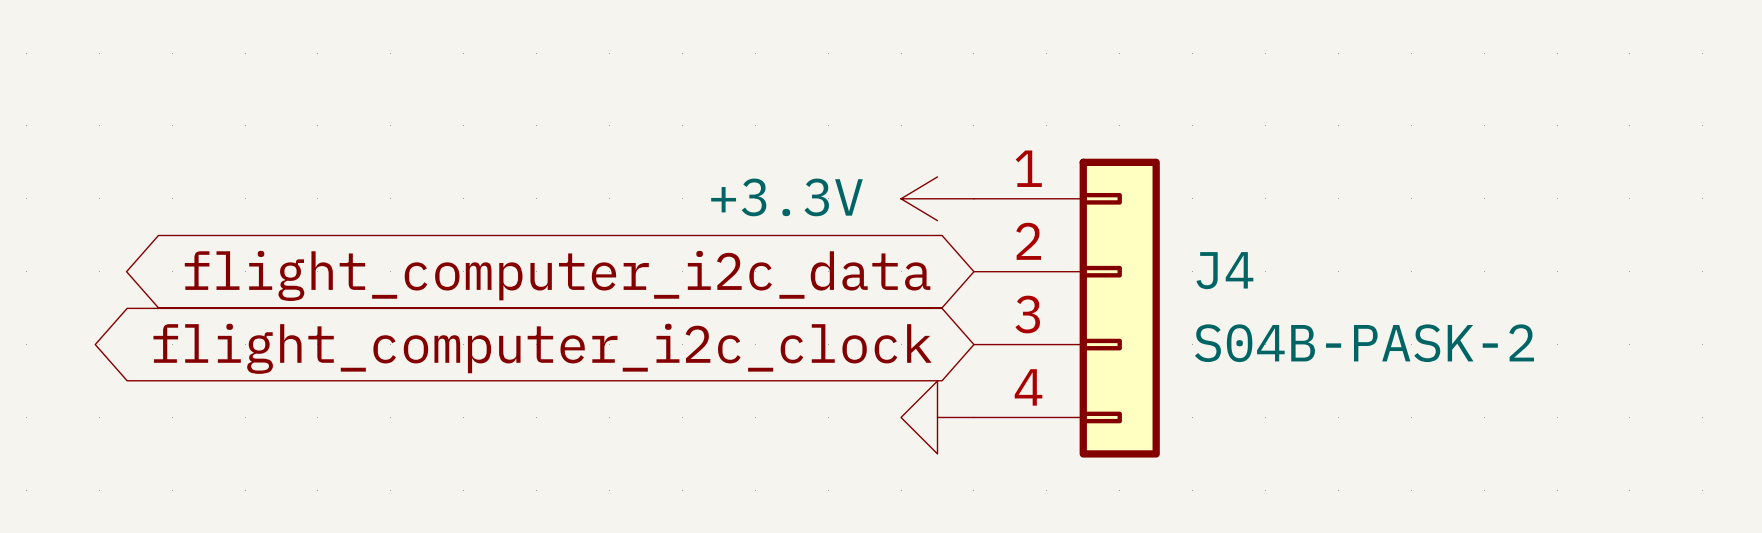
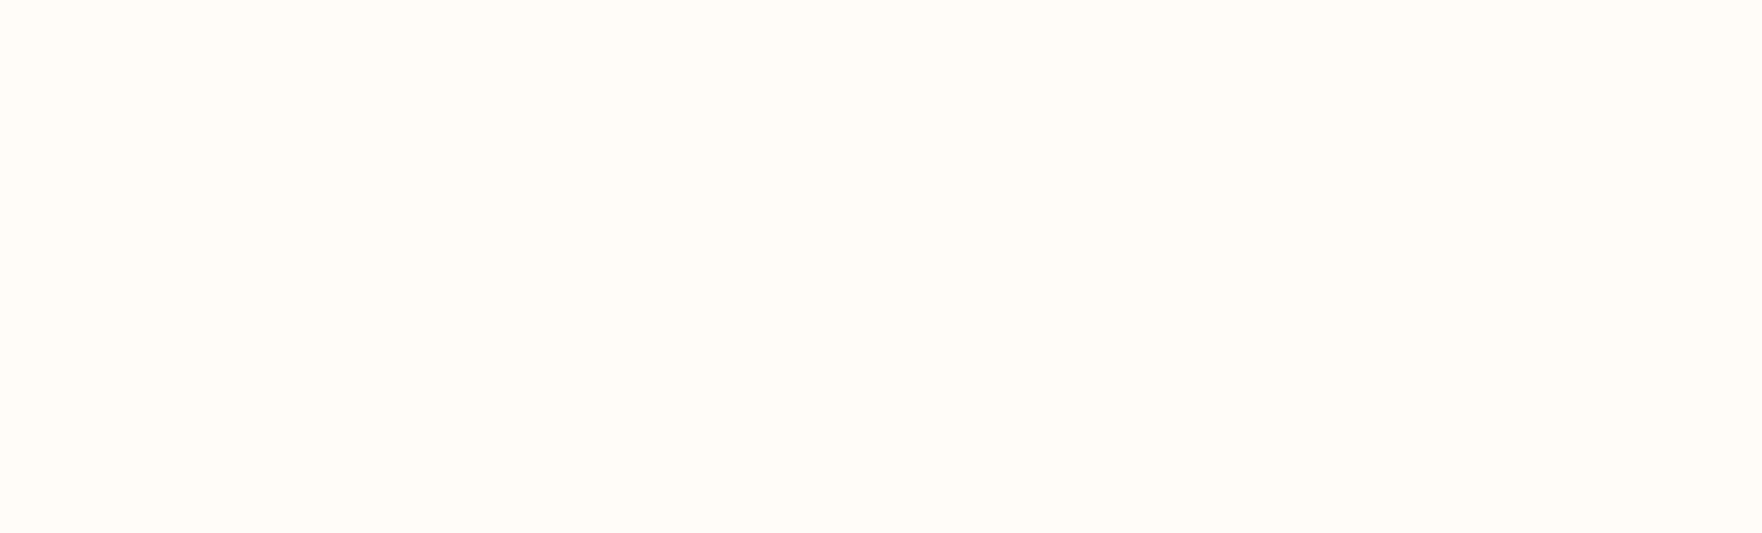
power symbol: +3.3V (937, 198) -> none
global label: flight_computer_i2c_data (557, 275) -> none
J4: S04B-PASK-2 (1066, 308) -> none
global label: flight_computer_i2c_clock (542, 348) -> none
power symbol: (937, 417) -> none

